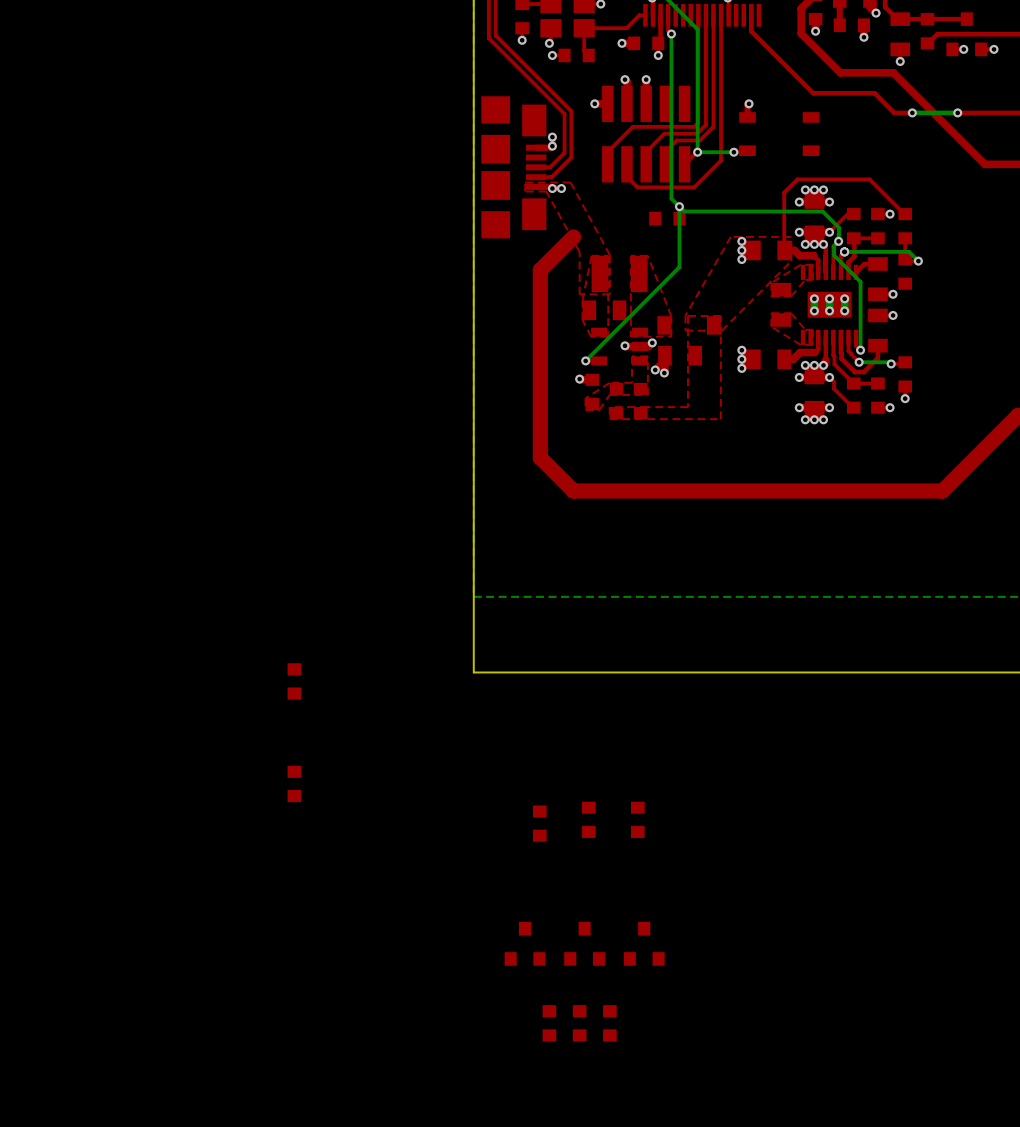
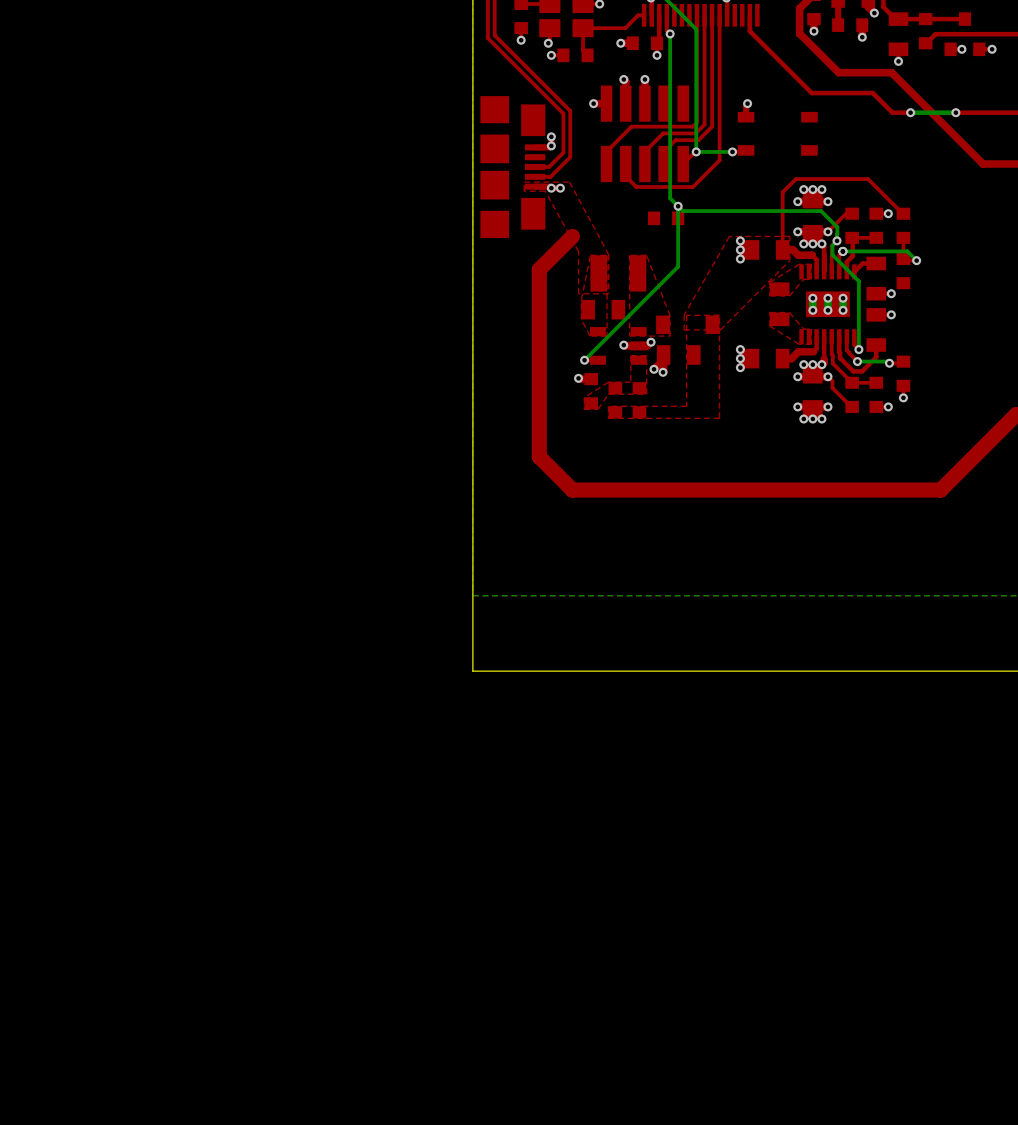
part: (294, 681) -> none
part: (294, 783) -> none
part: (588, 819) -> none
part: (637, 819) -> none
part: (539, 823) -> none
part: (525, 943) -> none
part: (584, 943) -> none
part: (644, 943) -> none
part: (549, 1023) -> none
part: (579, 1023) -> none
part: (609, 1023) -> none

